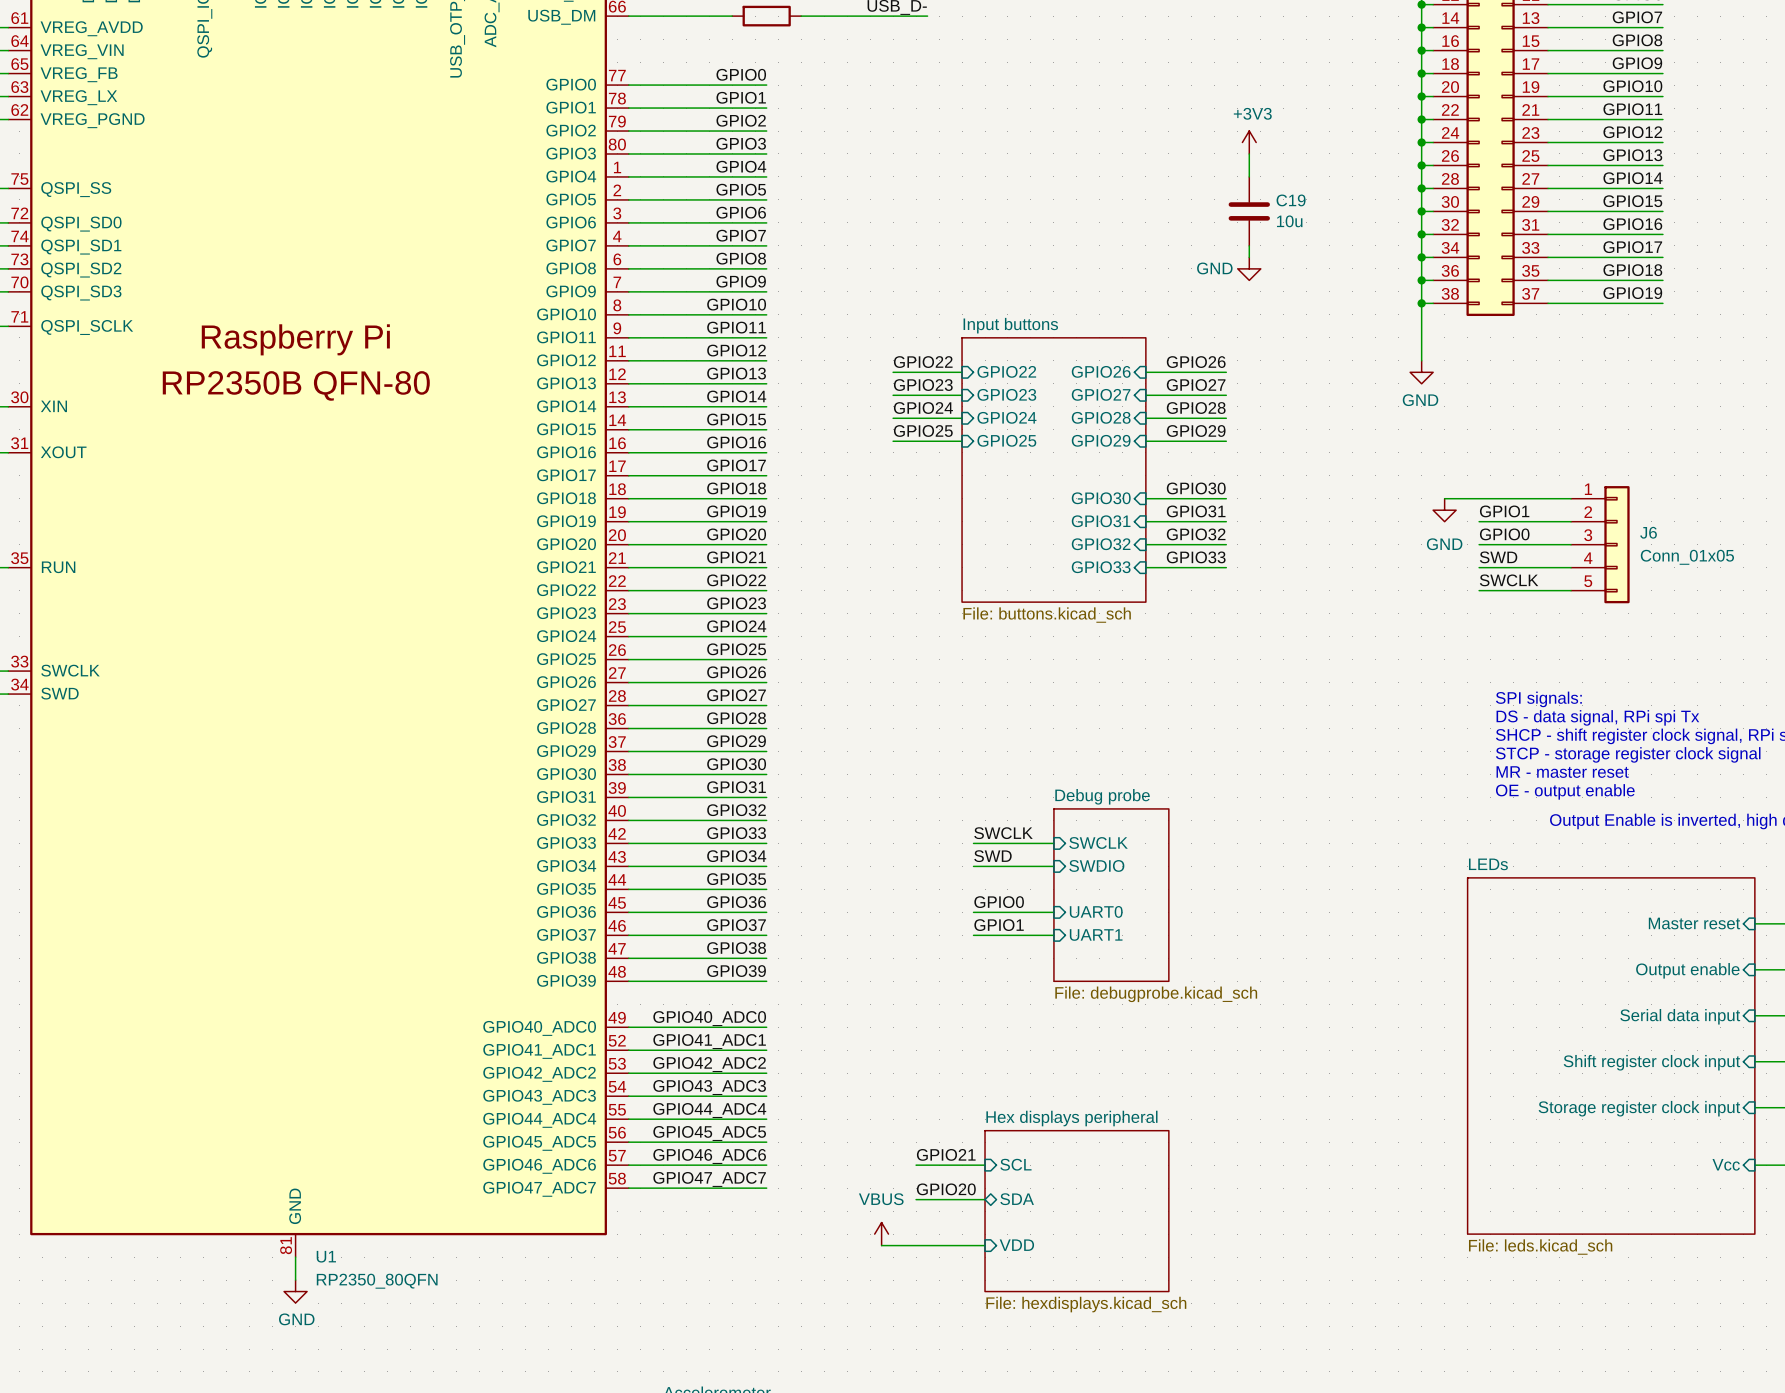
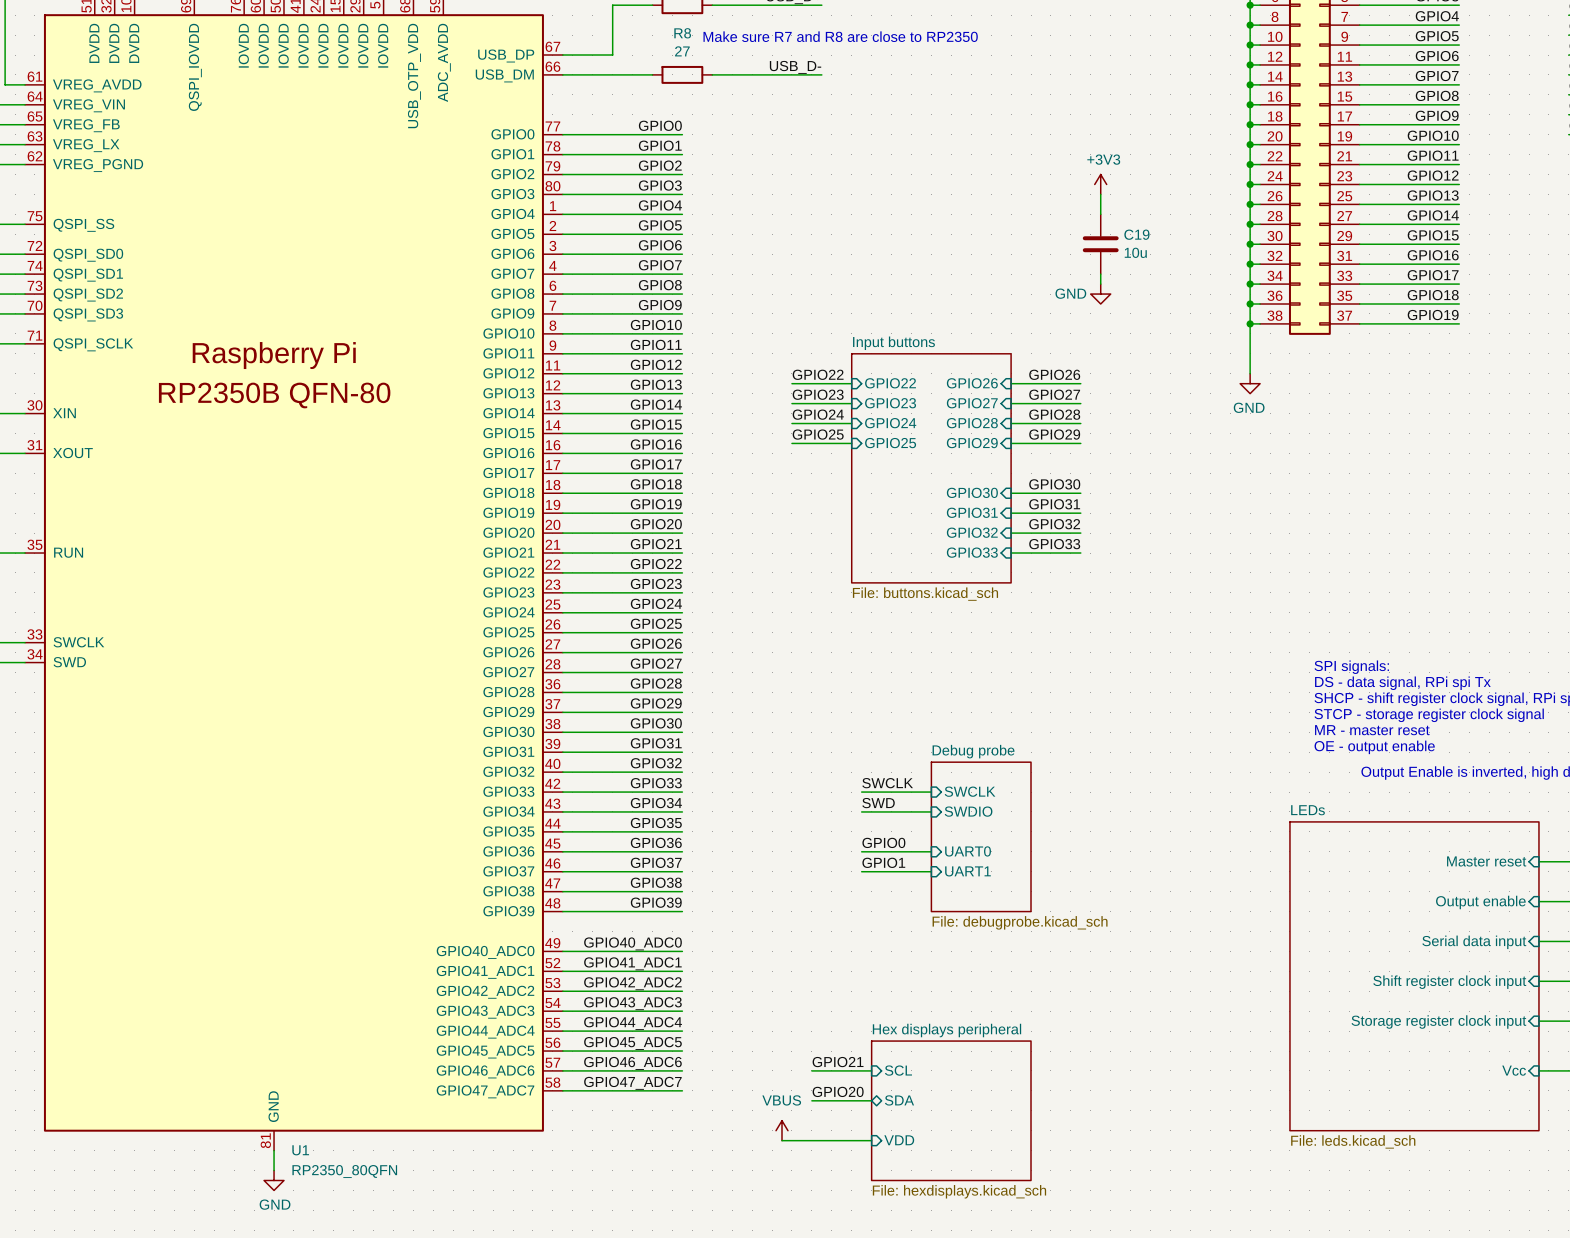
wire: (1444, 498) (1571, 498) -> none
power symbol: GND (1444, 510) -> none
label: GPIO1 (1504, 511) -> none
wire: (1479, 521) (1571, 521) -> none
label: GPIO0 (1504, 534) -> none
wire: (1479, 544) (1571, 544) -> none
J6: Conn_01x05 (1600, 544) -> none
label: SWD (1498, 557) -> none
wire: (1479, 567) (1571, 567) -> none
label: SWCLK (1509, 580) -> none
wire: (1479, 590) (1571, 590) -> none

